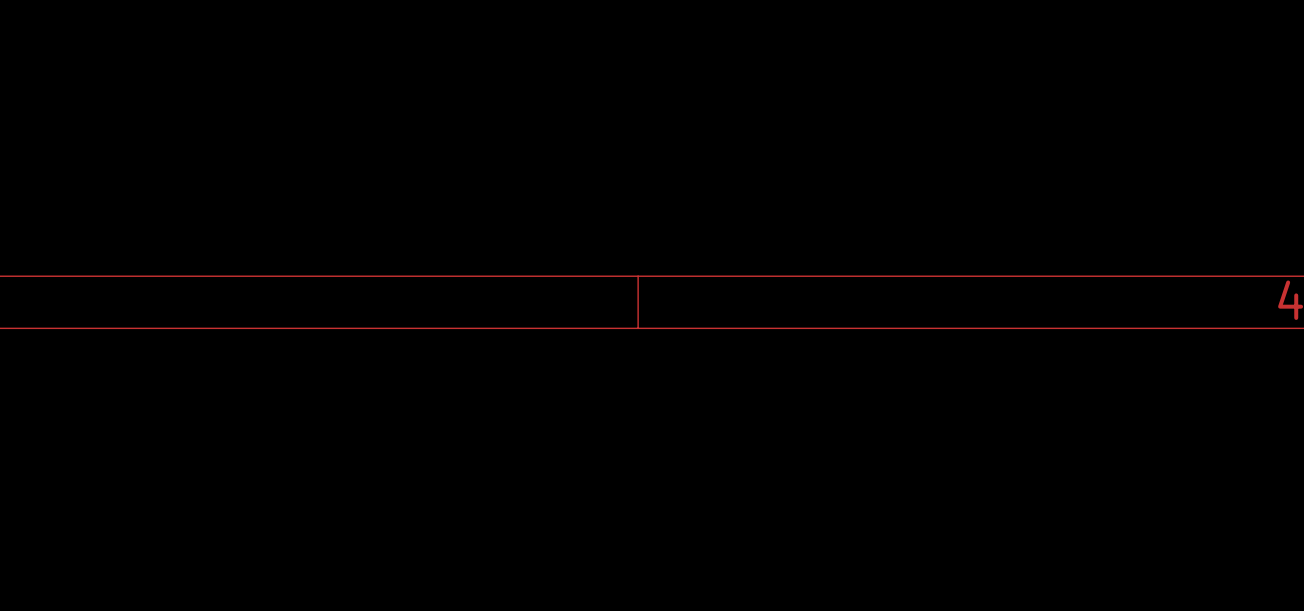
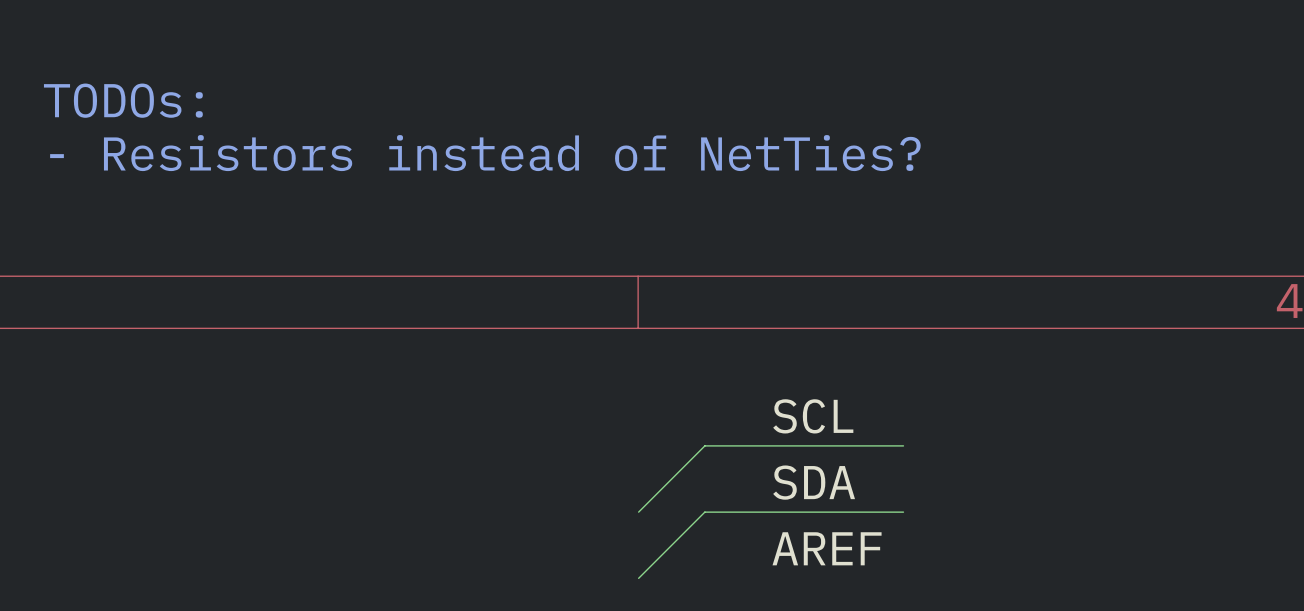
text: none -> TODOs: (123, 100)
text: none -> - Resistors instead of NetTies? (485, 153)
label: none -> SCL (813, 416)
wire: none -> (903, 445) (704, 445) (638, 512)
label: none -> SDA (814, 482)
wire: none -> (903, 512) (704, 512) (638, 578)
label: none -> AREF (827, 548)

